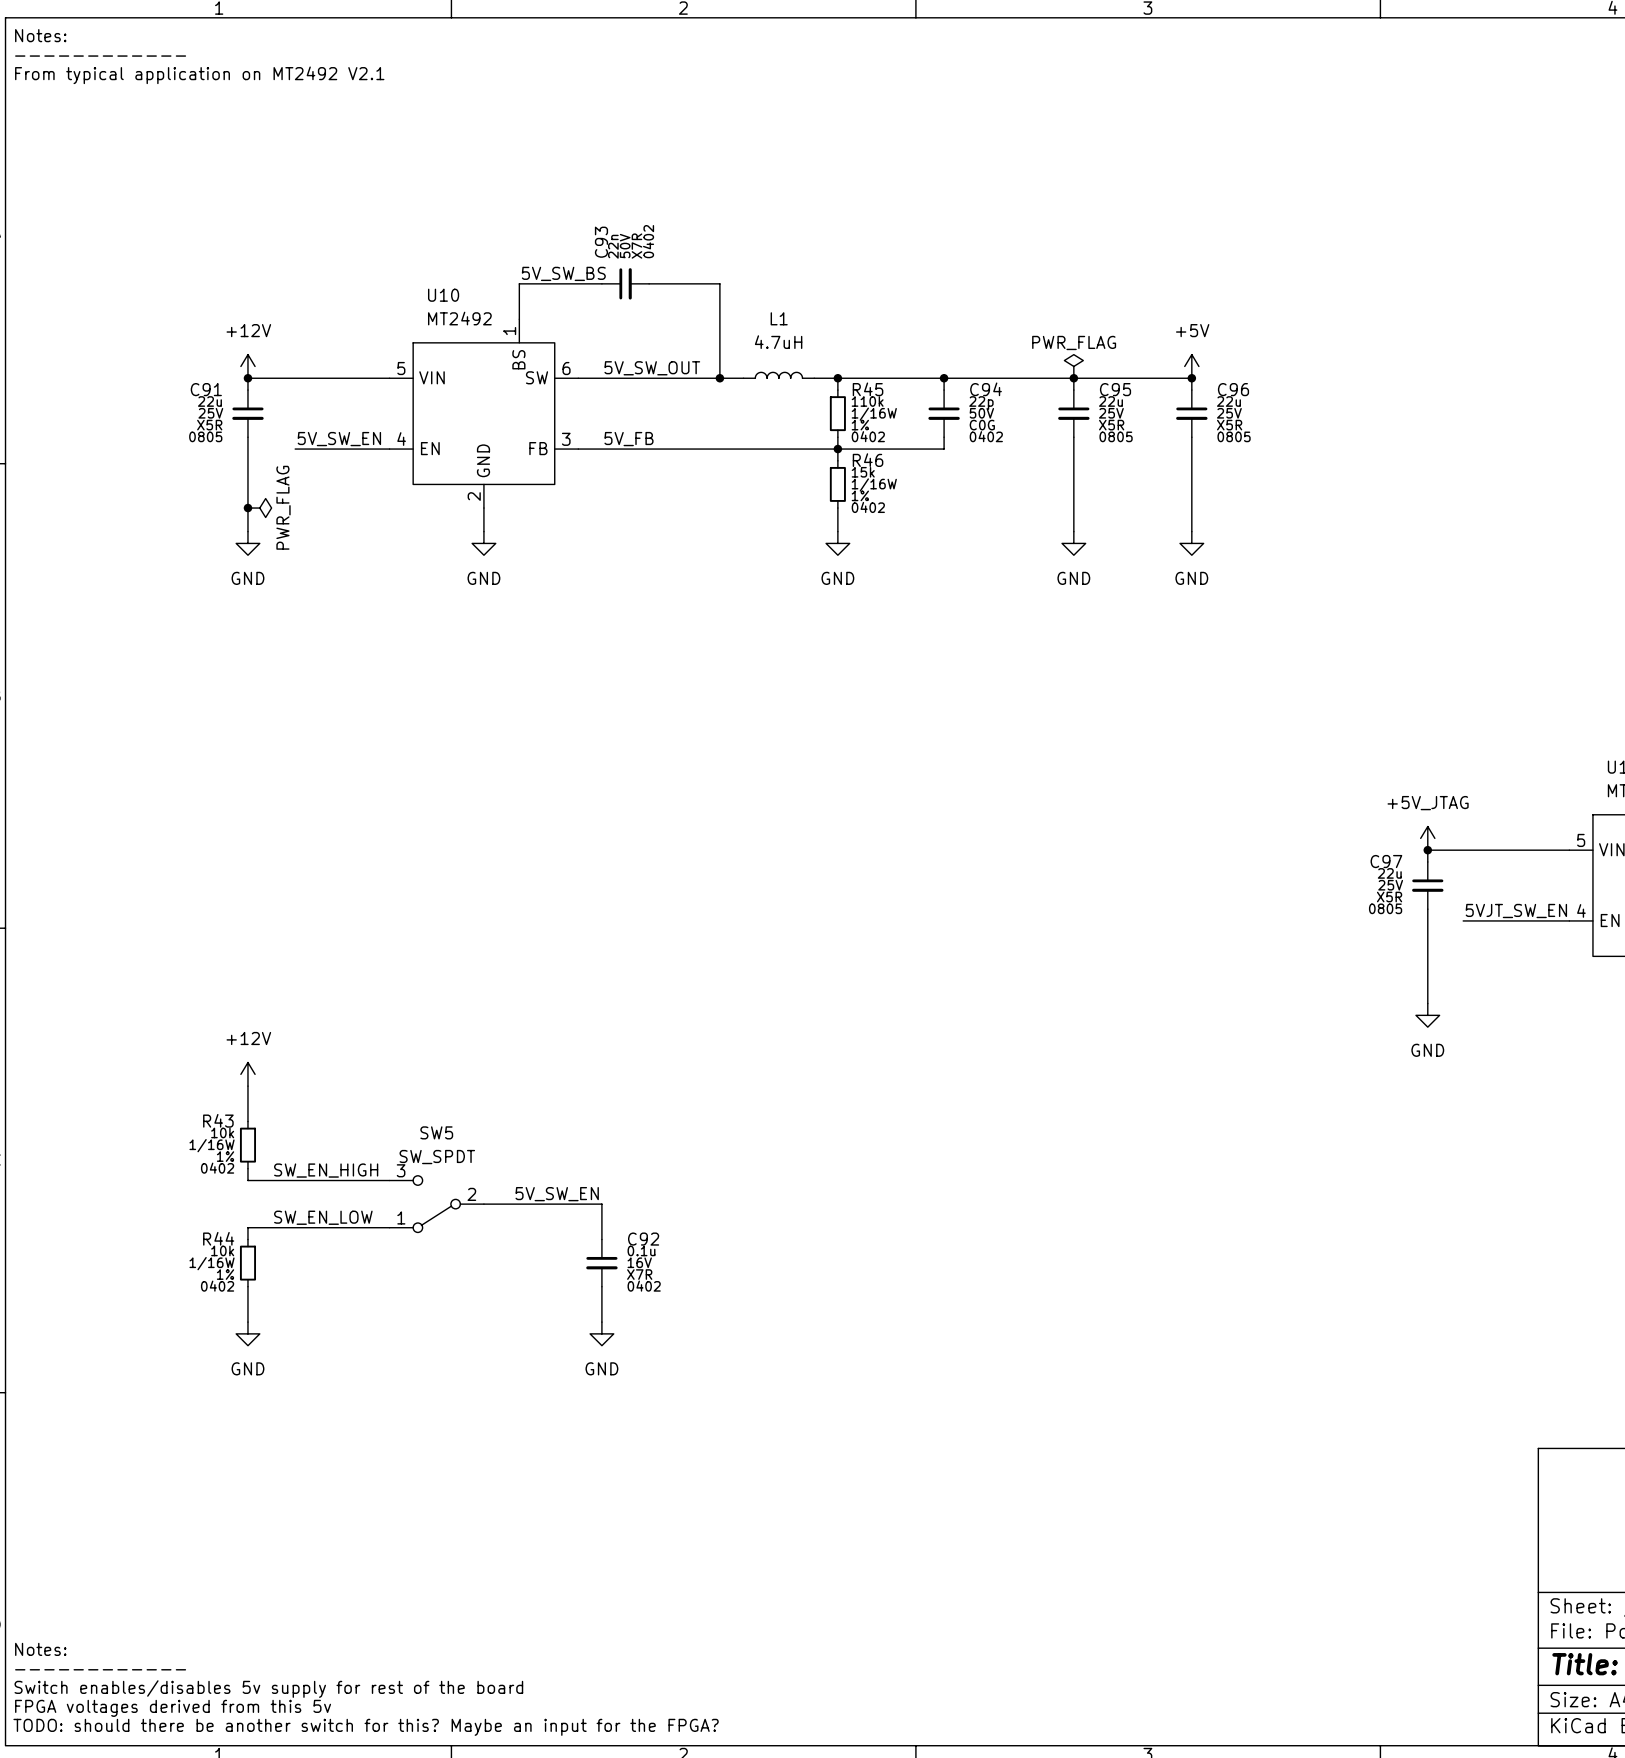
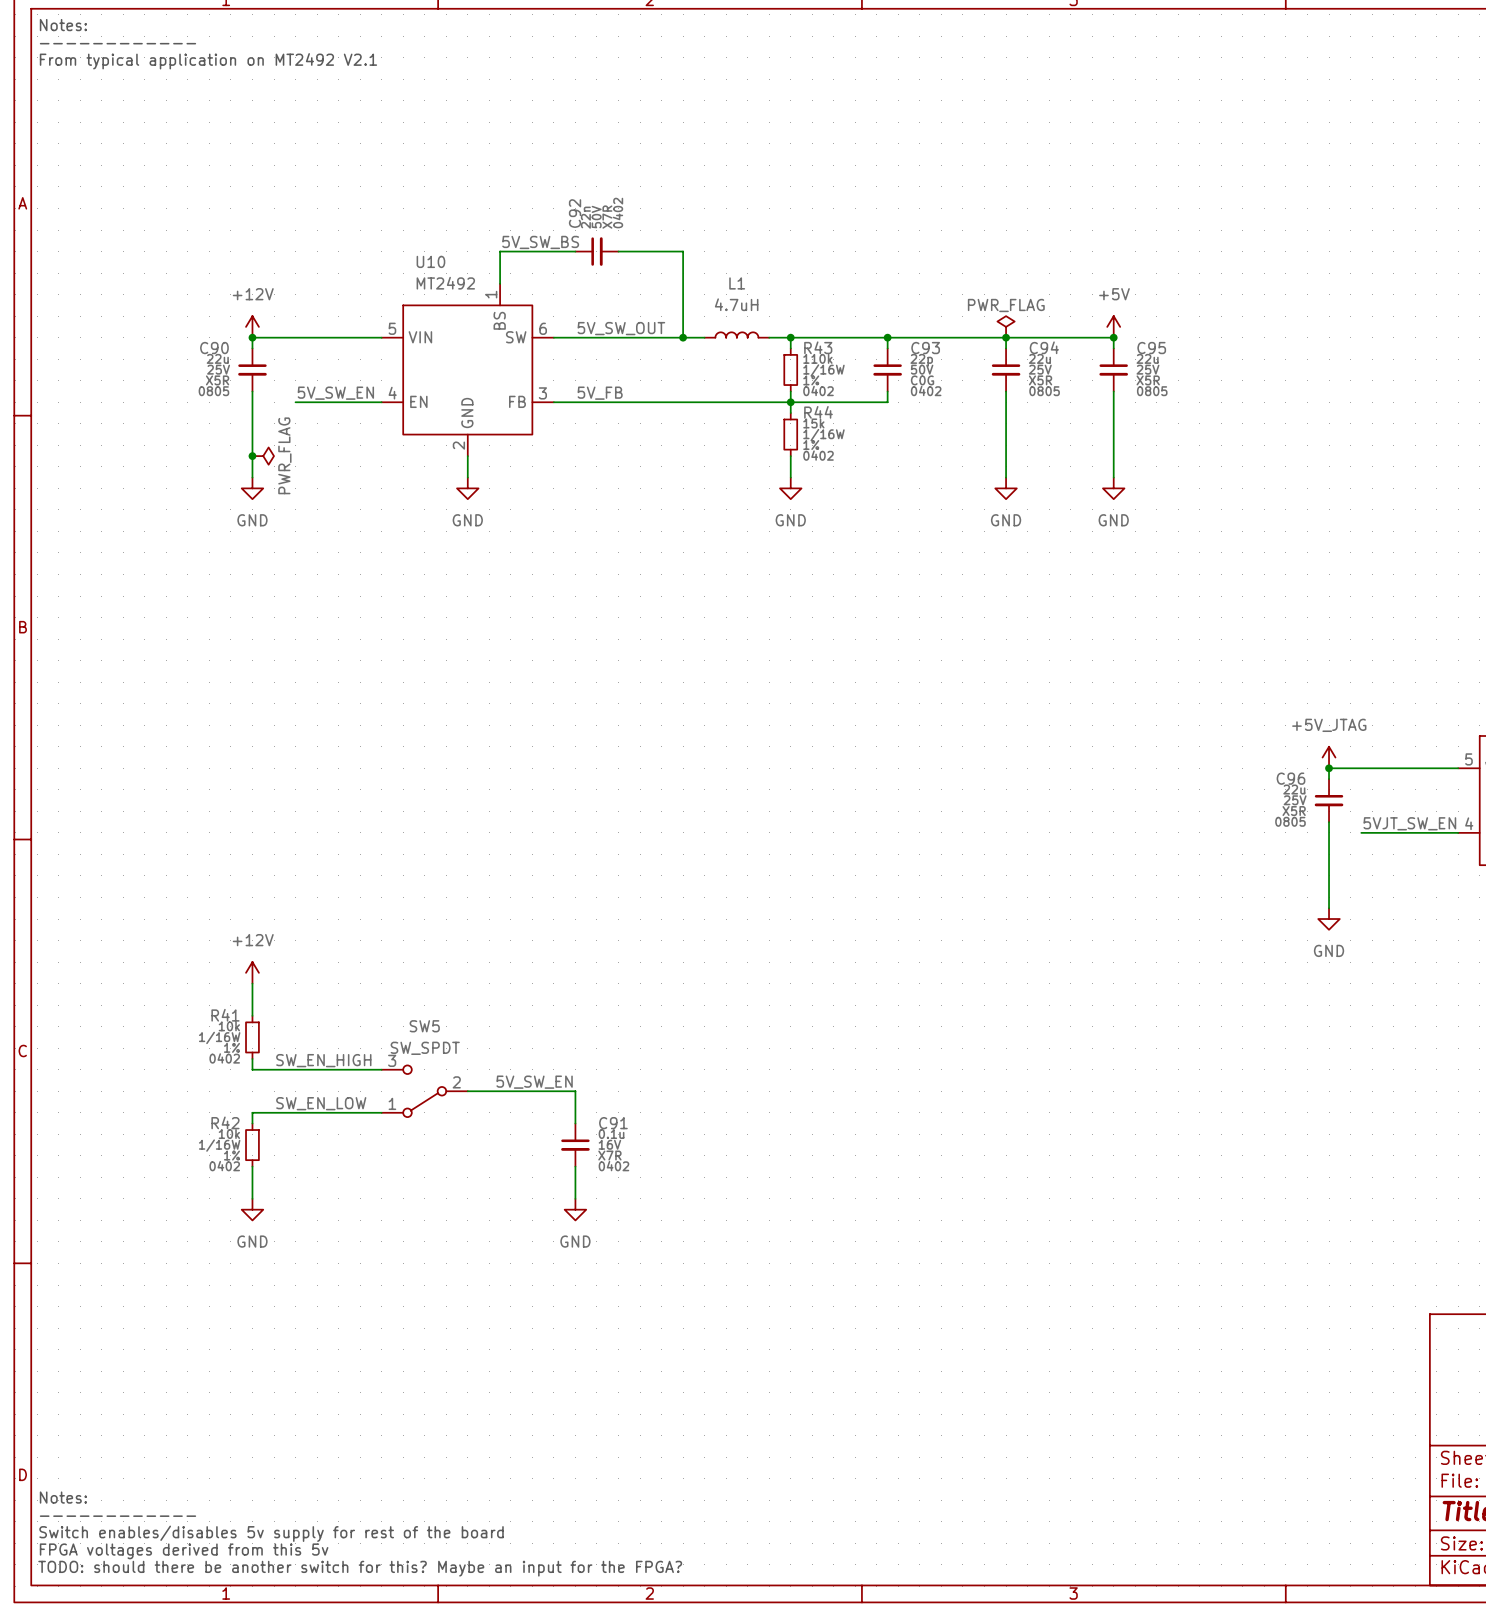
C93 name: C93 (601, 242) -> C92 (575, 213)
C91 name: C91 (206, 389) -> C90 (214, 348)
R45 name: R45 (868, 389) -> R43 (818, 347)
C94 name: C94 (986, 389) -> C93 (925, 348)
C95 name: C95 (1115, 389) -> C94 (1044, 347)
C96 name: C96 (1233, 389) -> C95 (1151, 348)
R46 name: R46 (868, 460) -> R44 (818, 412)
C97 name: C97 (1386, 861) -> C96 (1291, 778)
R43 name: R43 (218, 1120) -> R41 (225, 1015)
R44 name: R44 (218, 1238) -> R42 (225, 1122)
C92 name: C92 (643, 1239) -> C91 (613, 1123)

